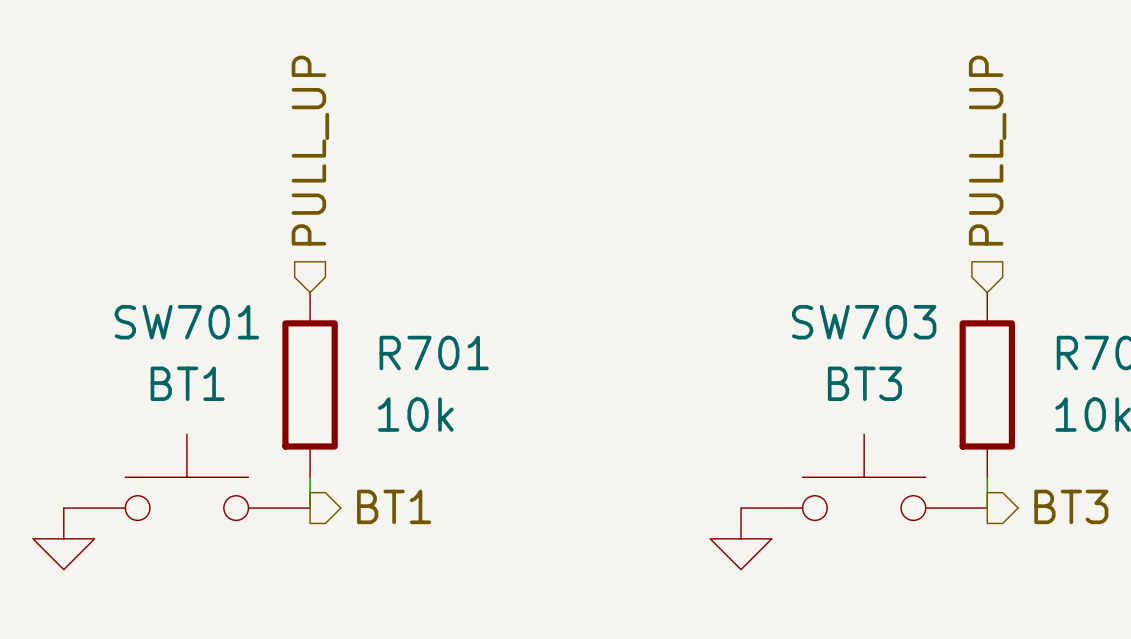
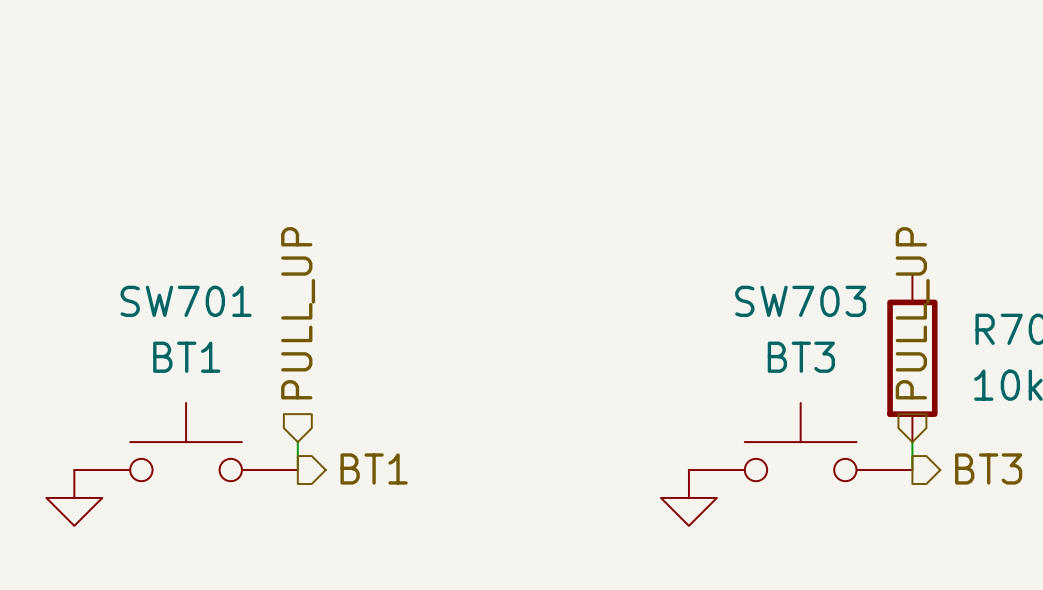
hierarchical label position: PULL_UP (310, 150) -> PULL_UP (298, 313)
hierarchical label position: PULL_UP (987, 150) -> PULL_UP (912, 313)
R701: 10k (310, 384) -> none

